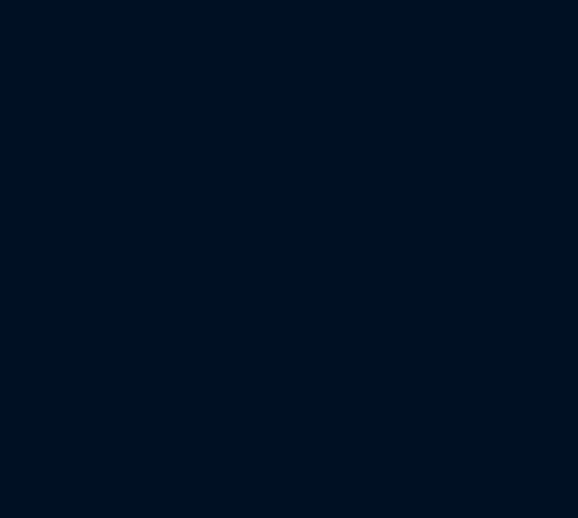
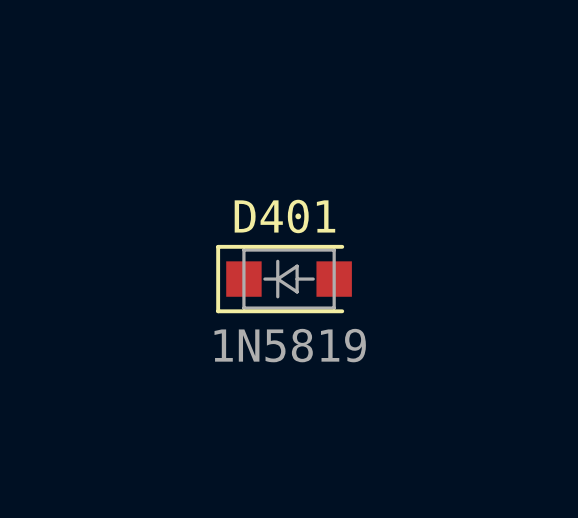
D401: none -> 1N5819 (284, 279)

